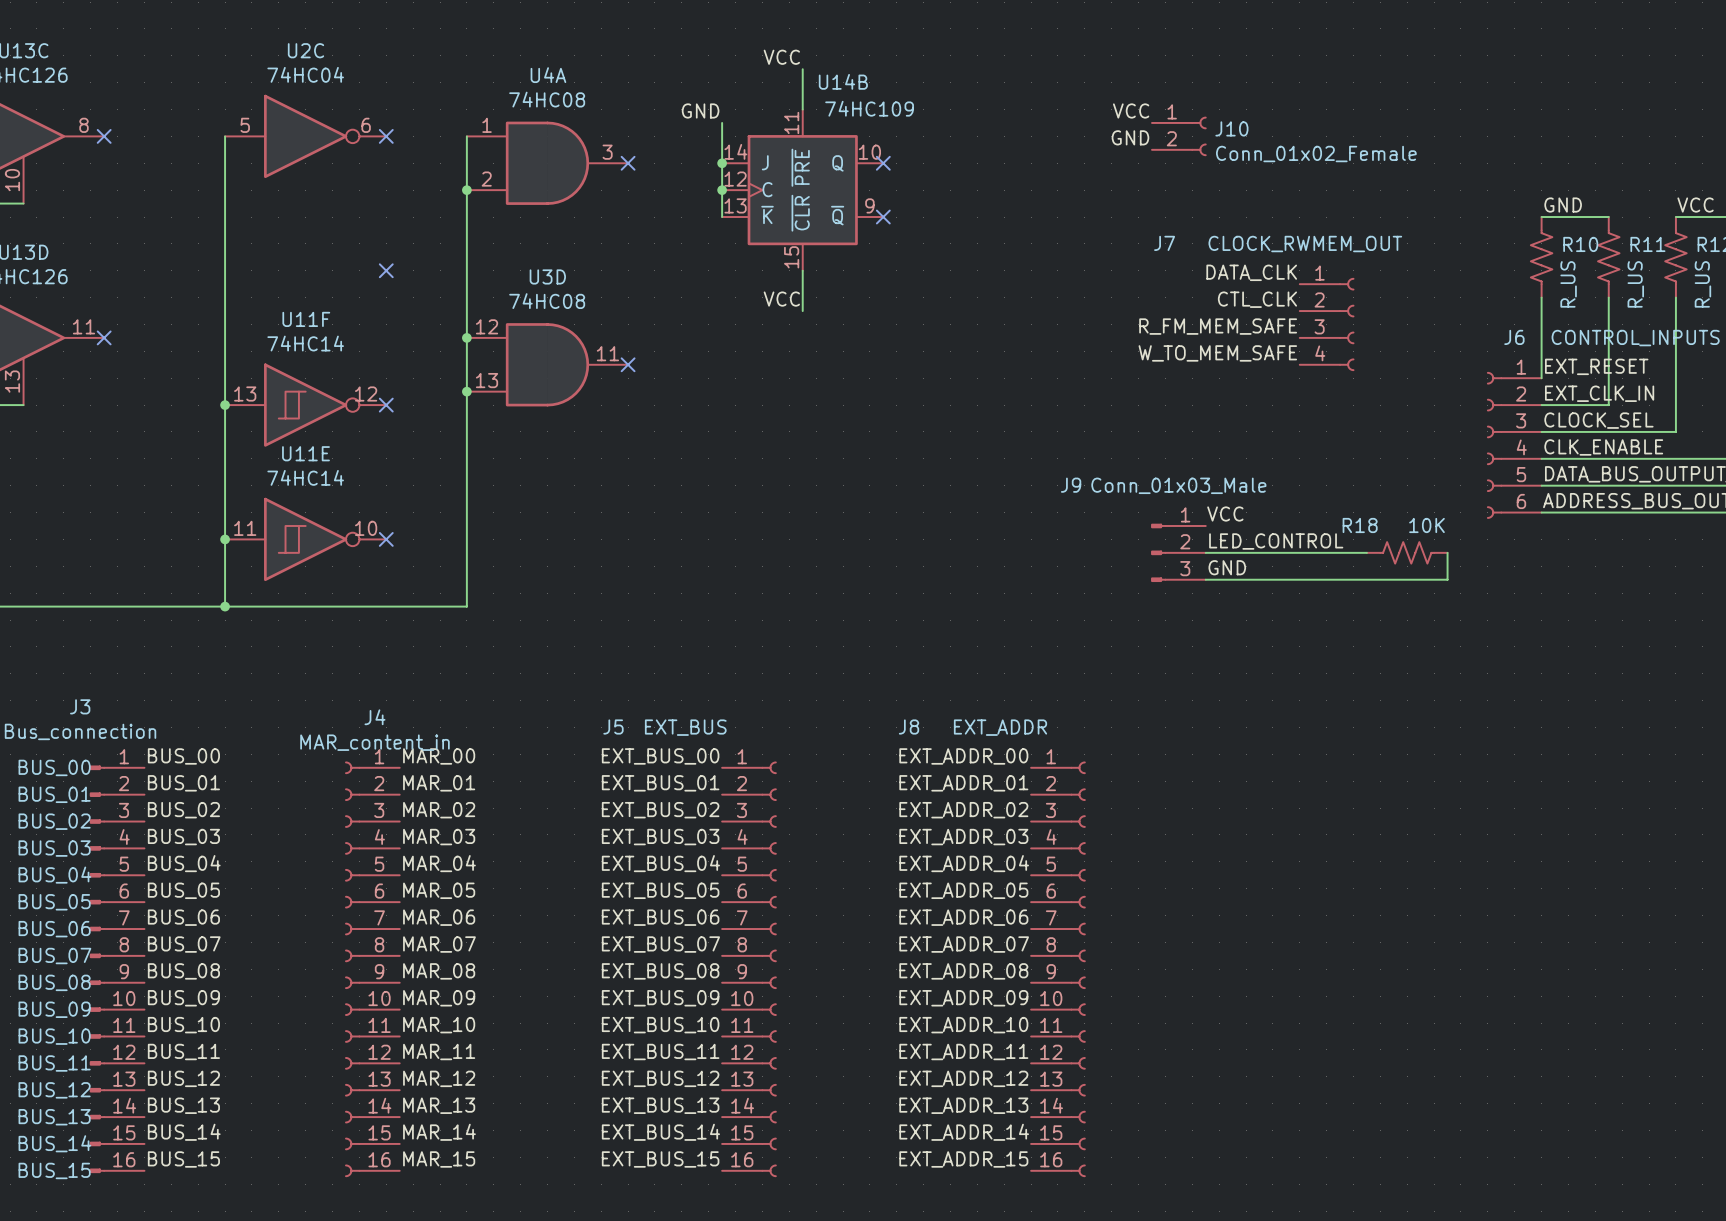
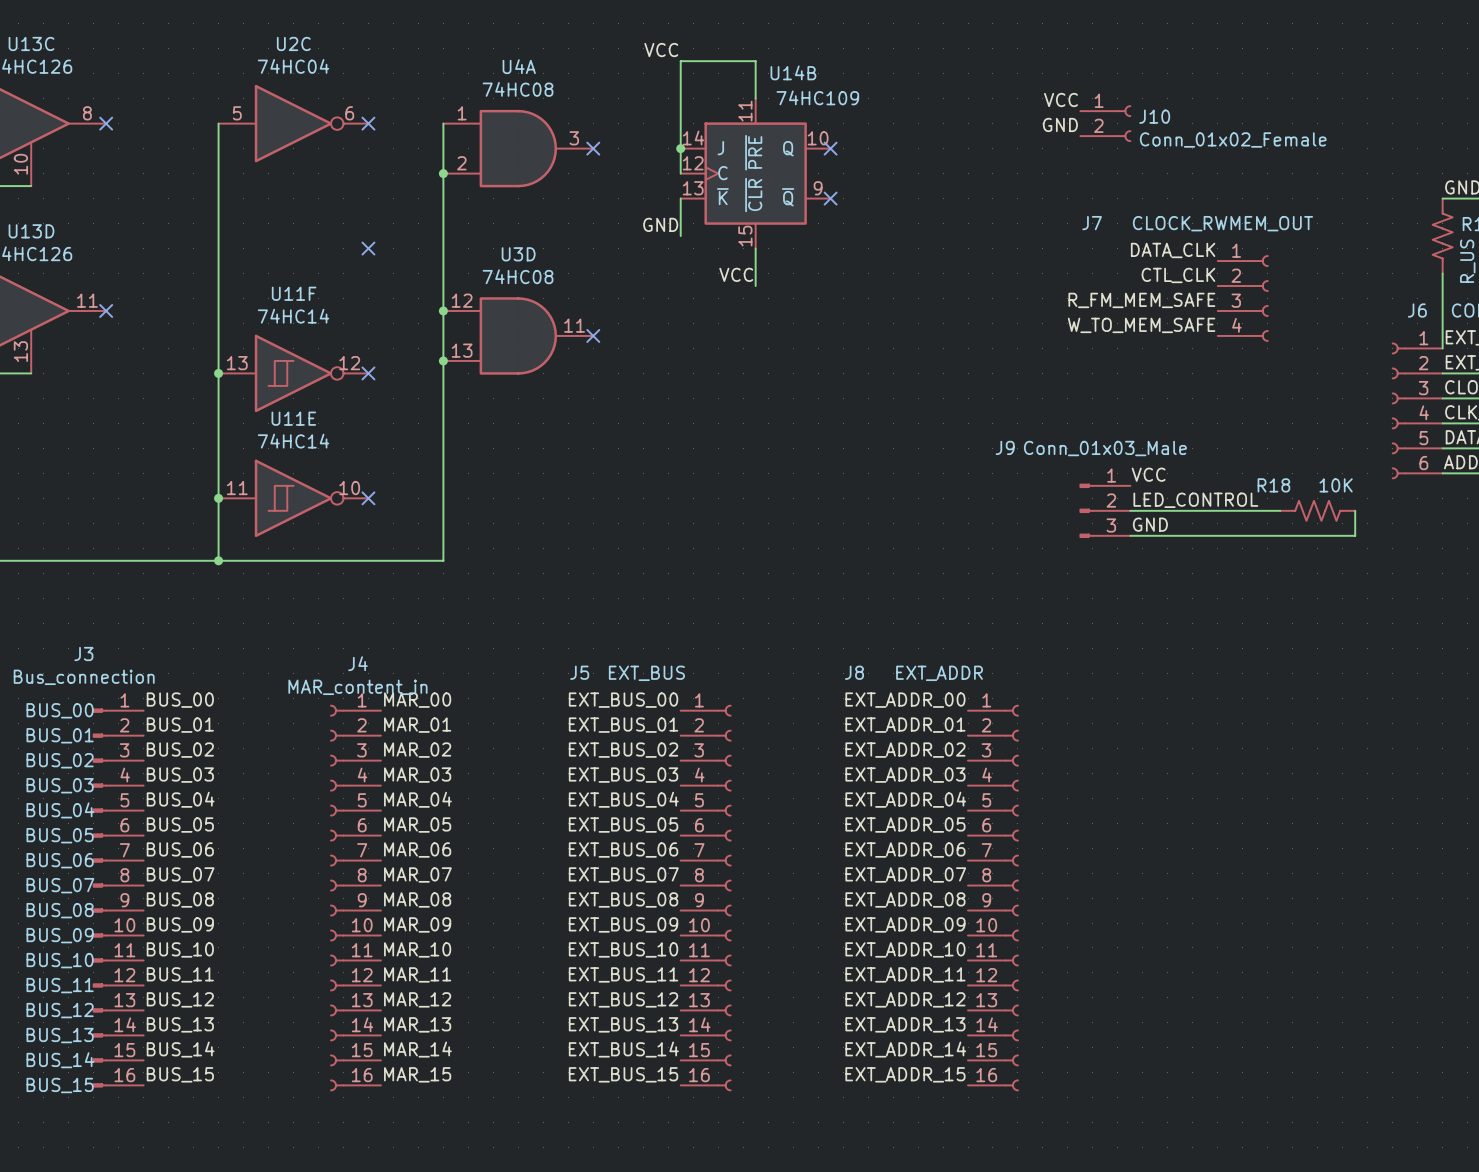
label position: VCC (781, 57) -> VCC (661, 50)
wire: none -> (755, 61) (680, 61) (680, 111)
label position: GND (700, 110) -> GND (660, 224)
wire: (722, 190) (722, 217) -> (680, 236) (680, 198)
junction: (722, 190) -> none

